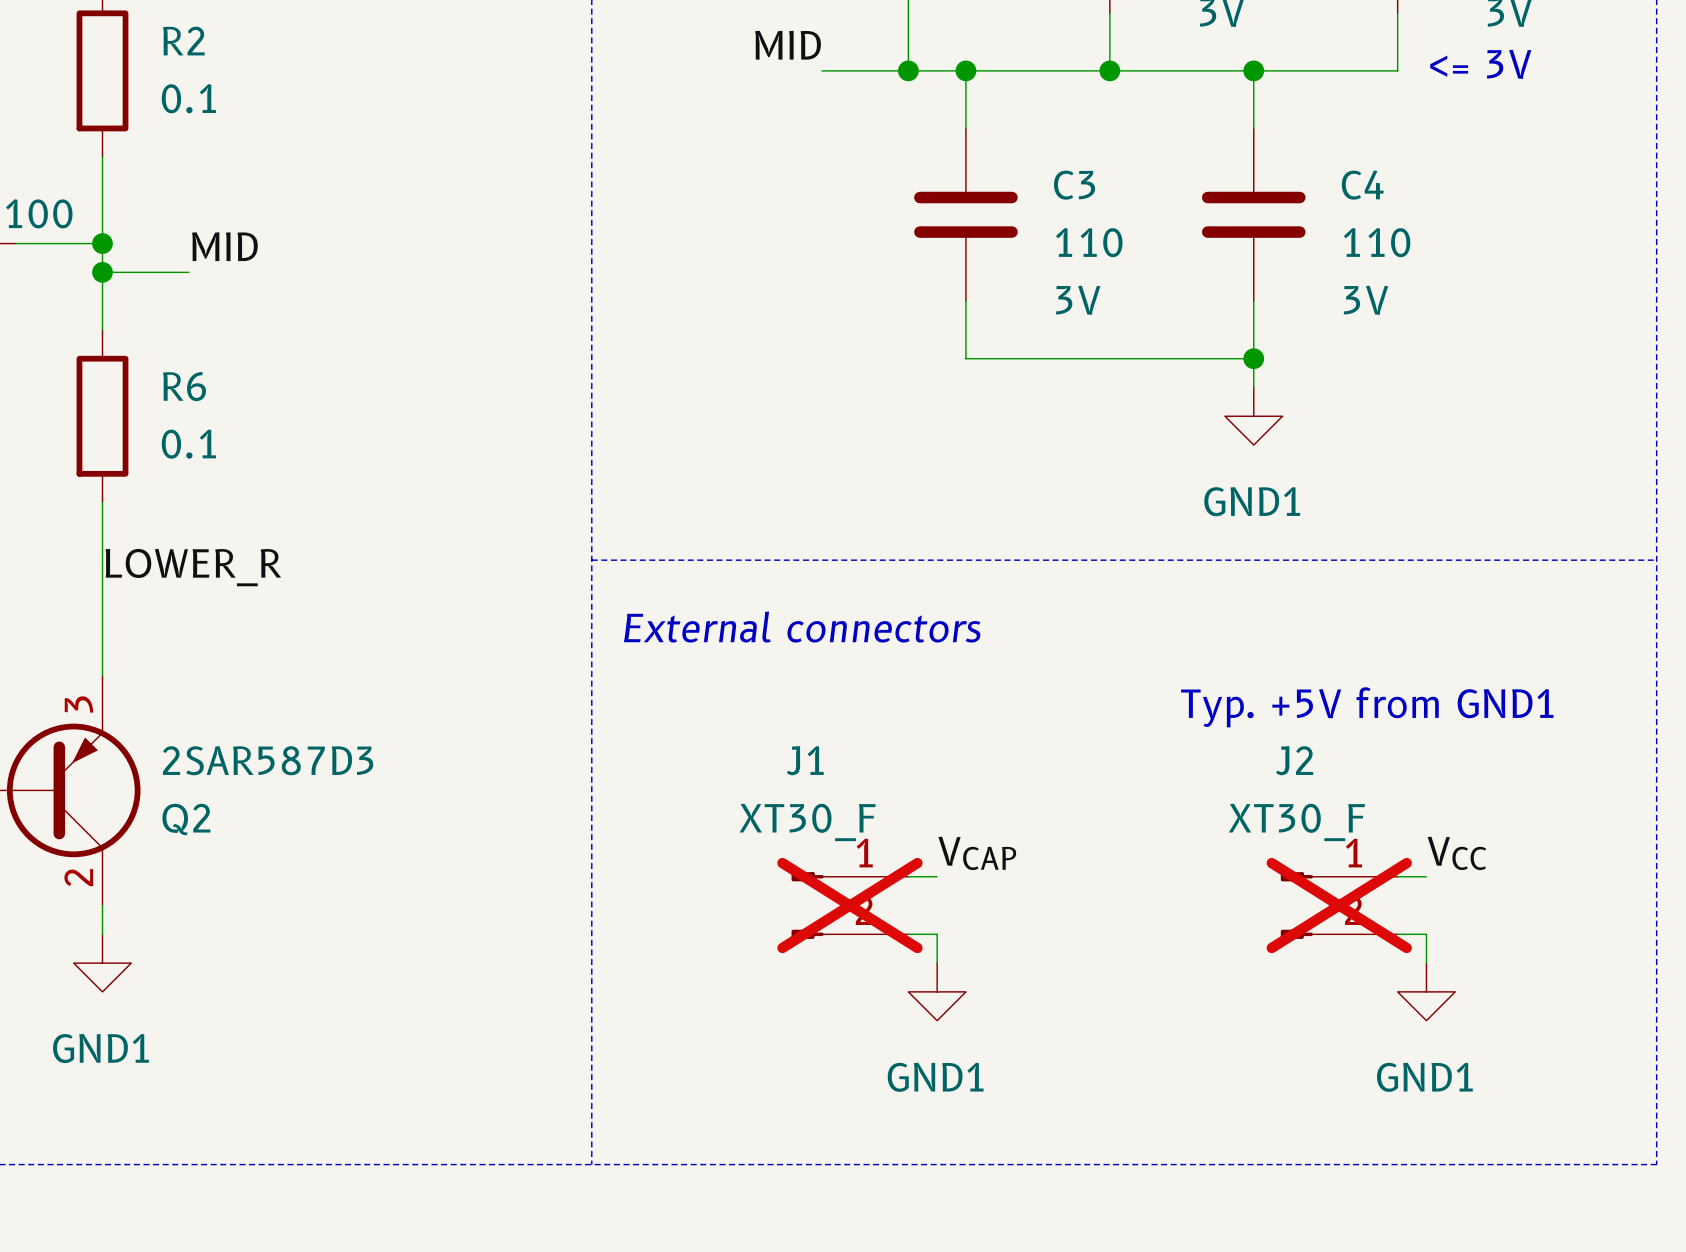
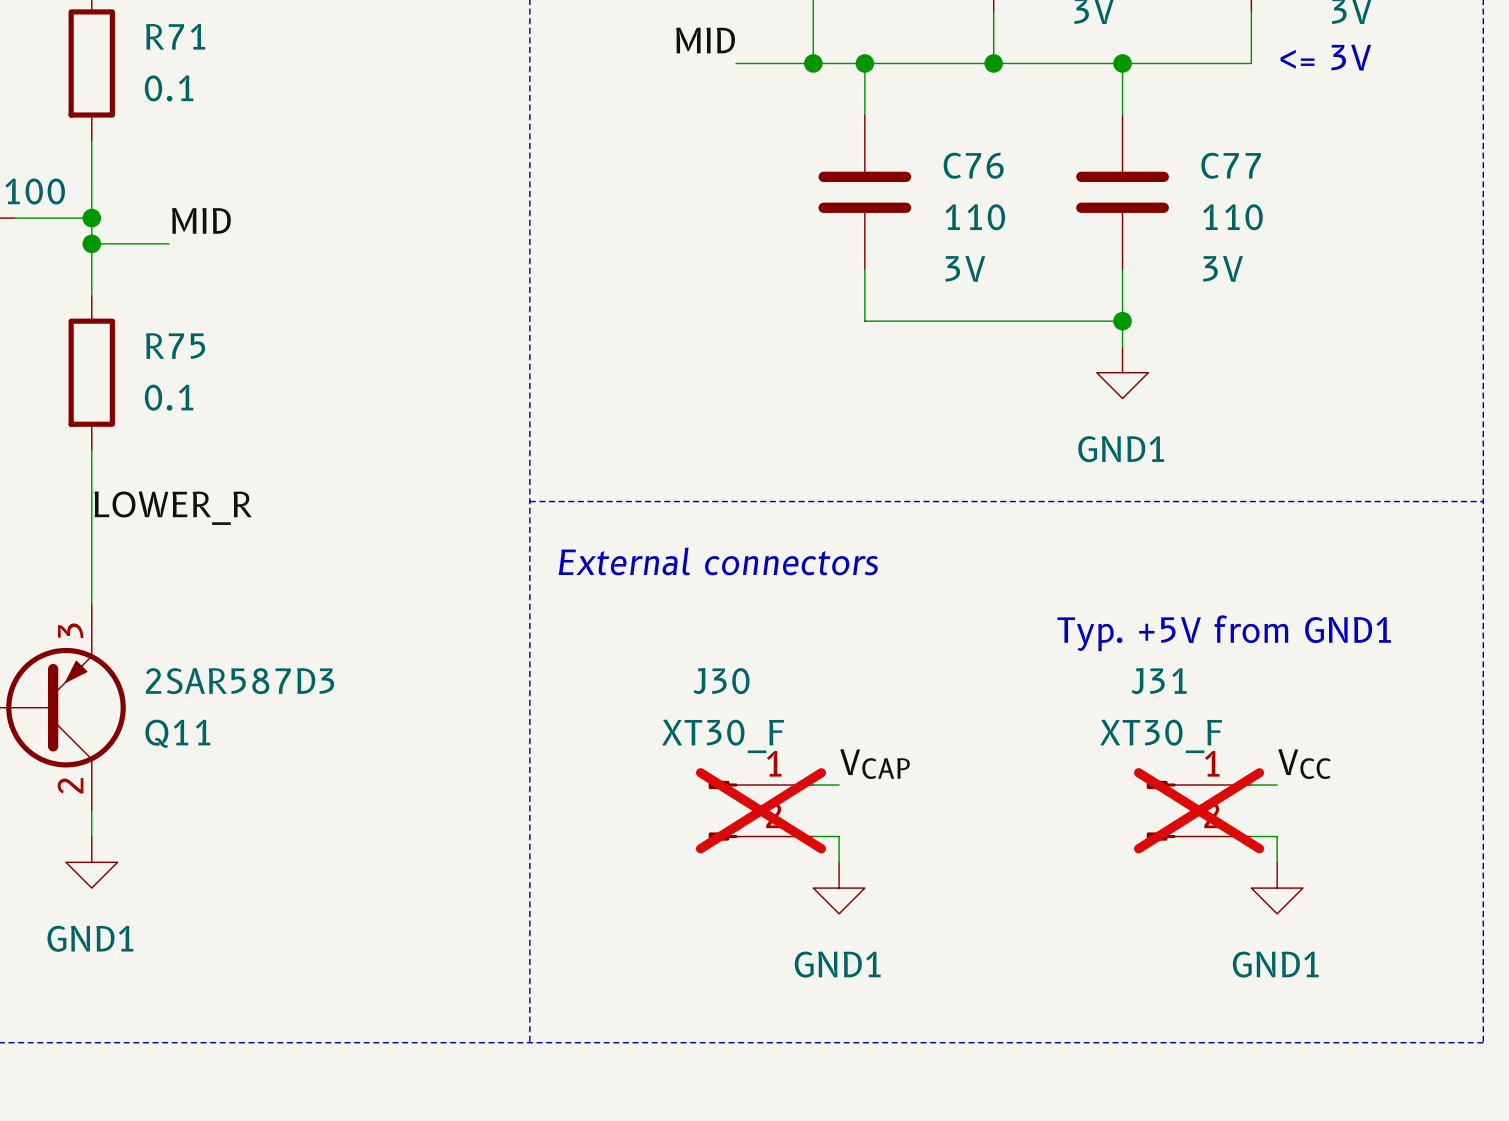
R2 name: R2 (183, 41) -> R71 (175, 36)
C3 name: C3 (1074, 185) -> C76 (973, 165)
C4 name: C4 (1362, 185) -> C77 (1231, 165)
R6 name: R6 (184, 386) -> R75 (175, 346)
J1 name: J1 (805, 760) -> J30 (721, 681)
J2 name: J2 (1294, 760) -> J31 (1159, 681)
Q2 name: Q2 (186, 819) -> Q11 (177, 733)

